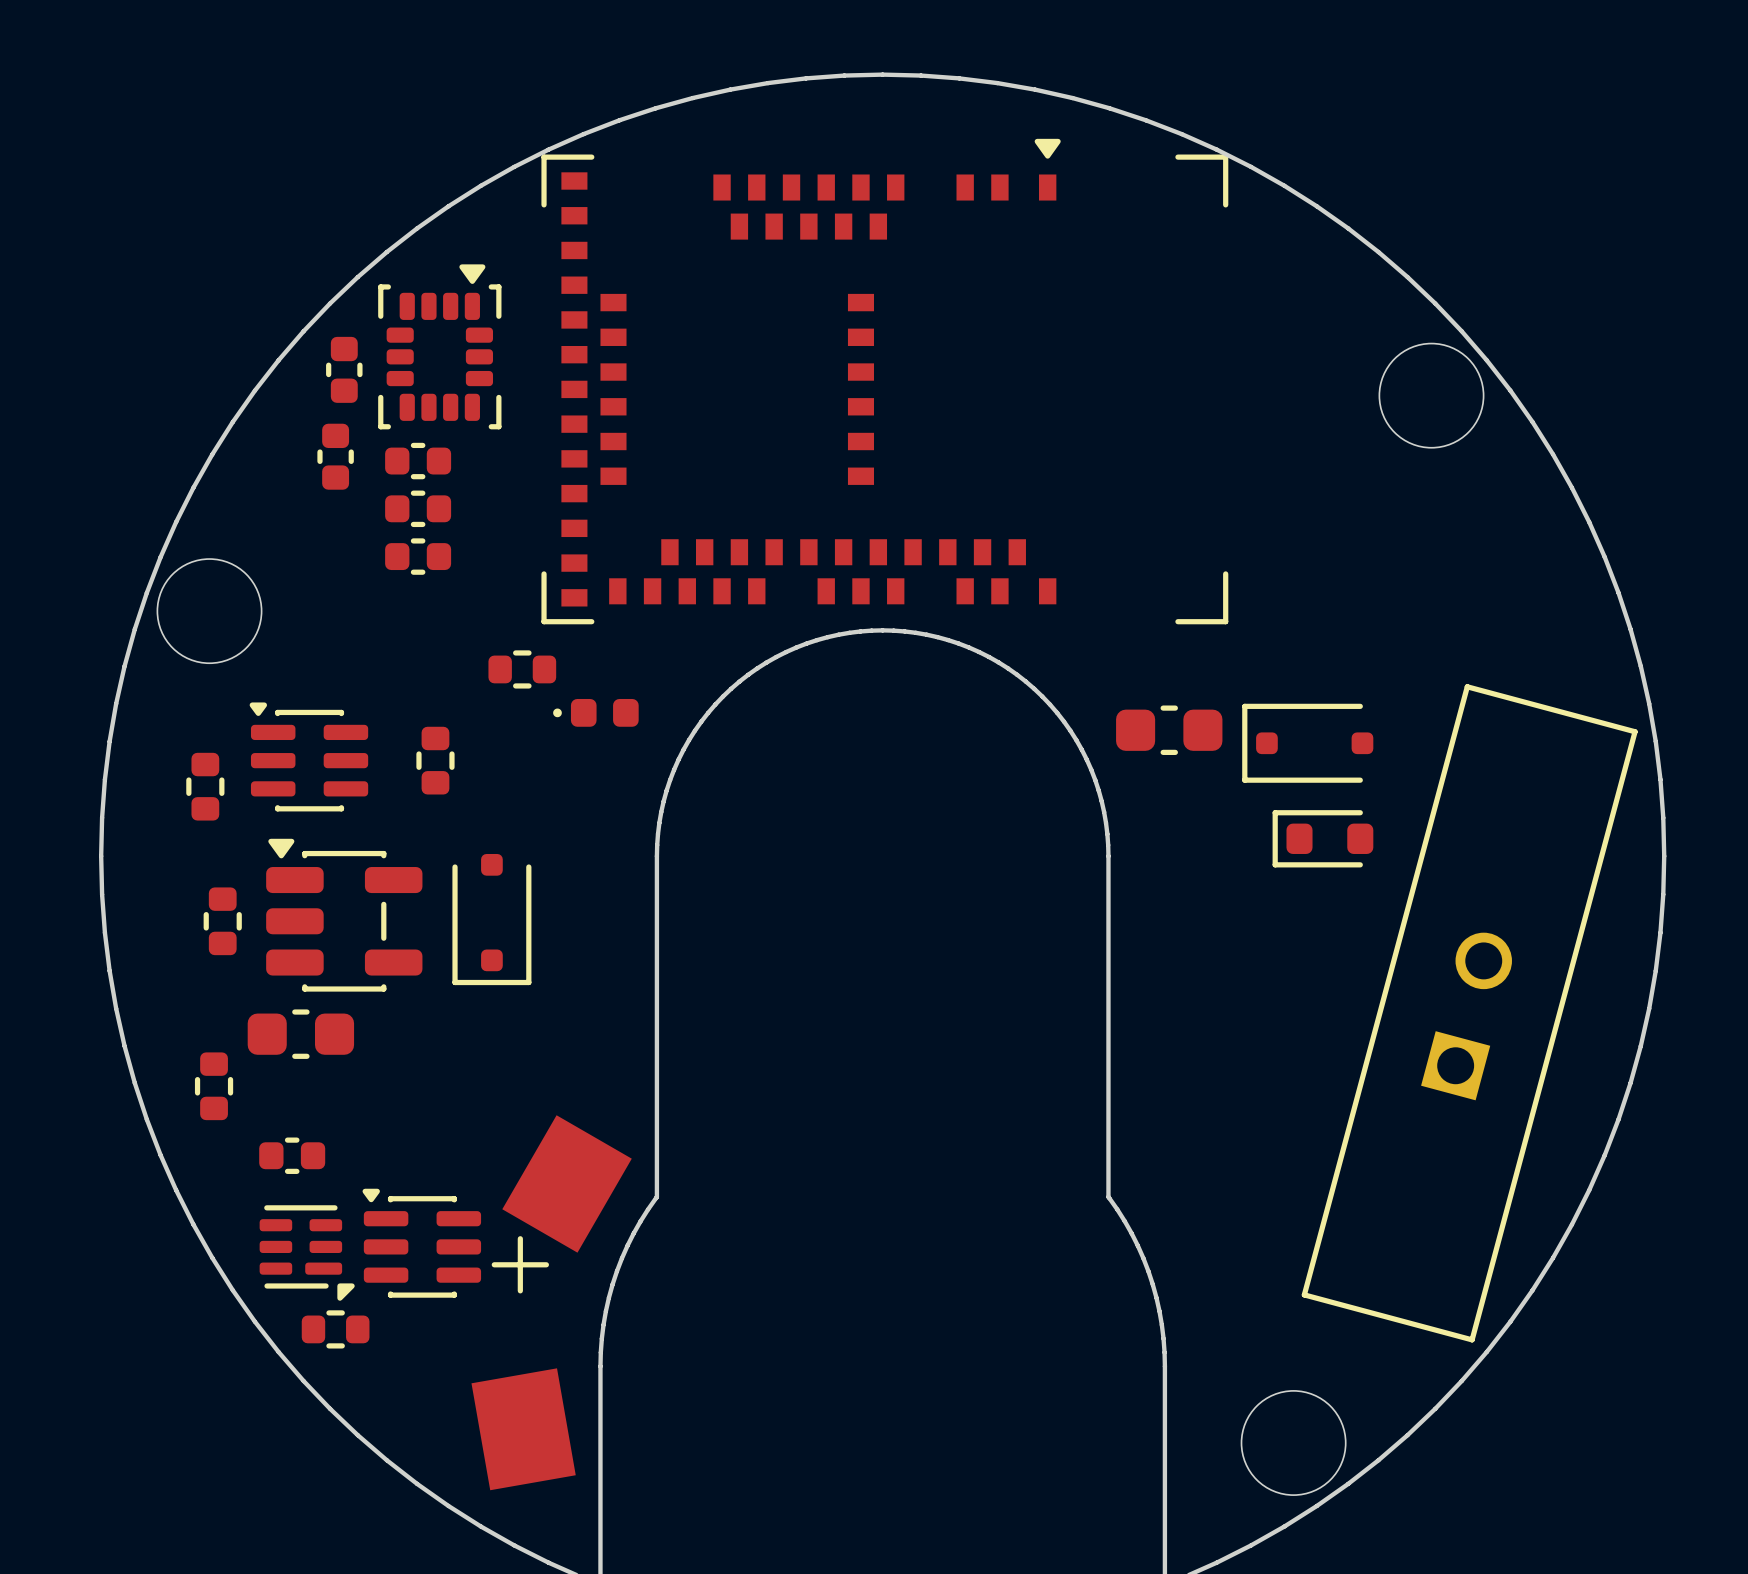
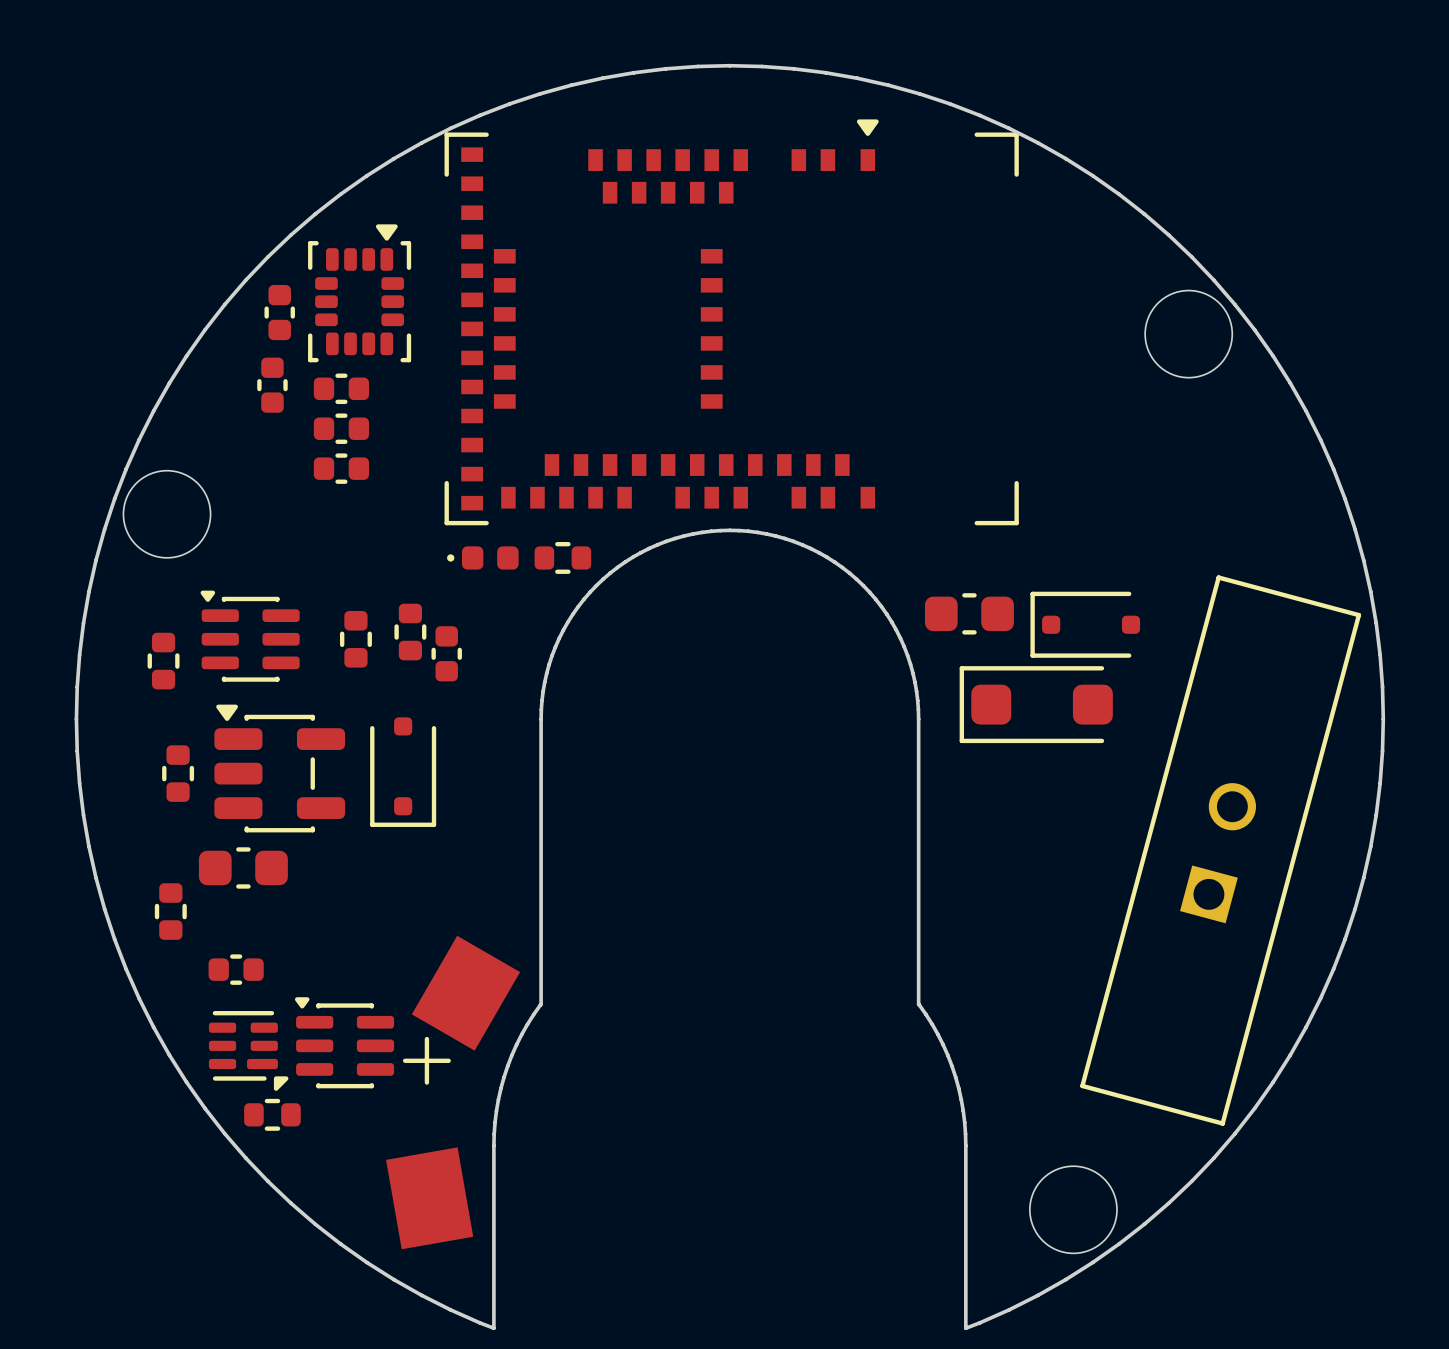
part: none -> (562, 557)
part: (522, 669) -> none
part position: (595, 712) -> (482, 557)
part: none -> (410, 632)
part: none -> (446, 653)
part: none -> (1036, 704)
part: (1322, 838) -> none

